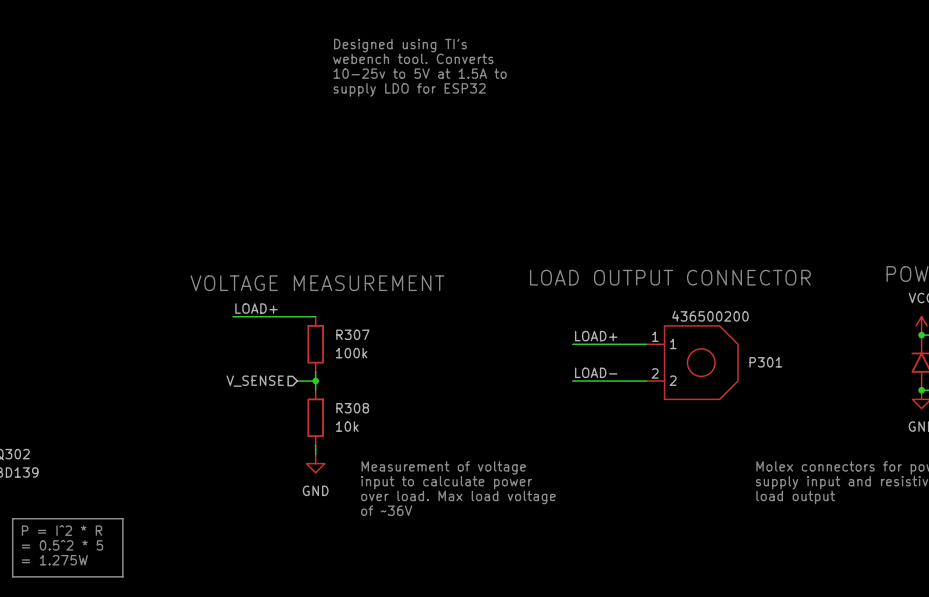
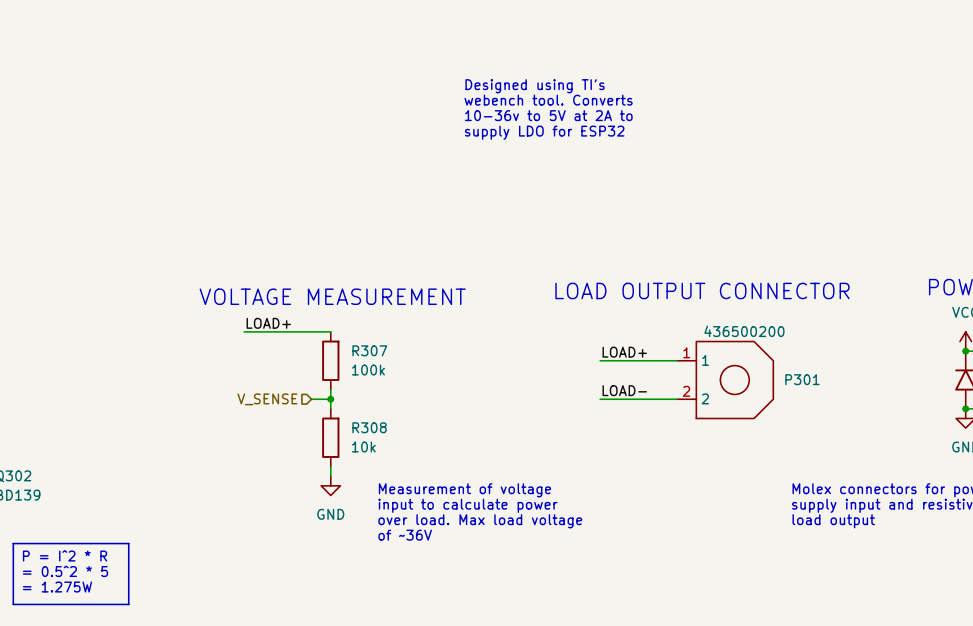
text position: Designed using TI's (400, 45) -> Designed using TI's (535, 86)
text position: webench tool. Converts (413, 58) -> webench tool. Converts (548, 100)
text: 10-25v to 5V at 1.5A to (420, 73) -> none
text position: supply LDO for ESP32 (409, 89) -> supply LDO for ESP32 (544, 132)
text: none -> 10-36v to 5V at 2A to (548, 115)

